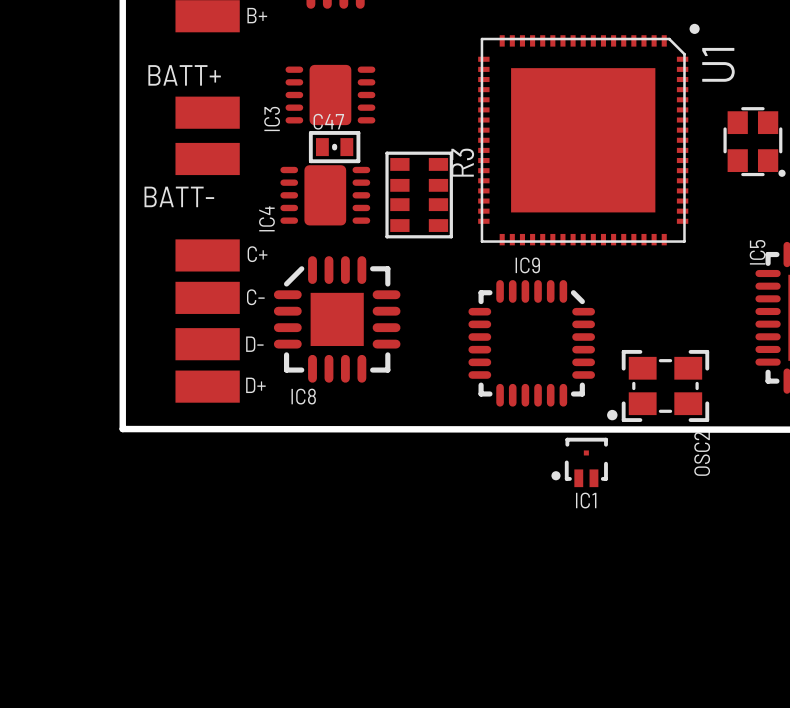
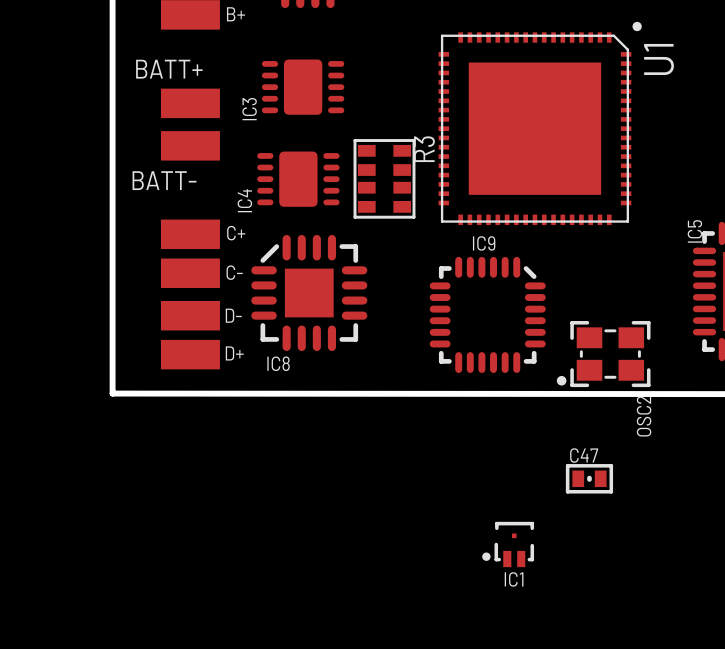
part: (754, 141) -> none
C47 position: (334, 147) -> (589, 478)
IC1 position: (579, 462) -> (508, 544)

